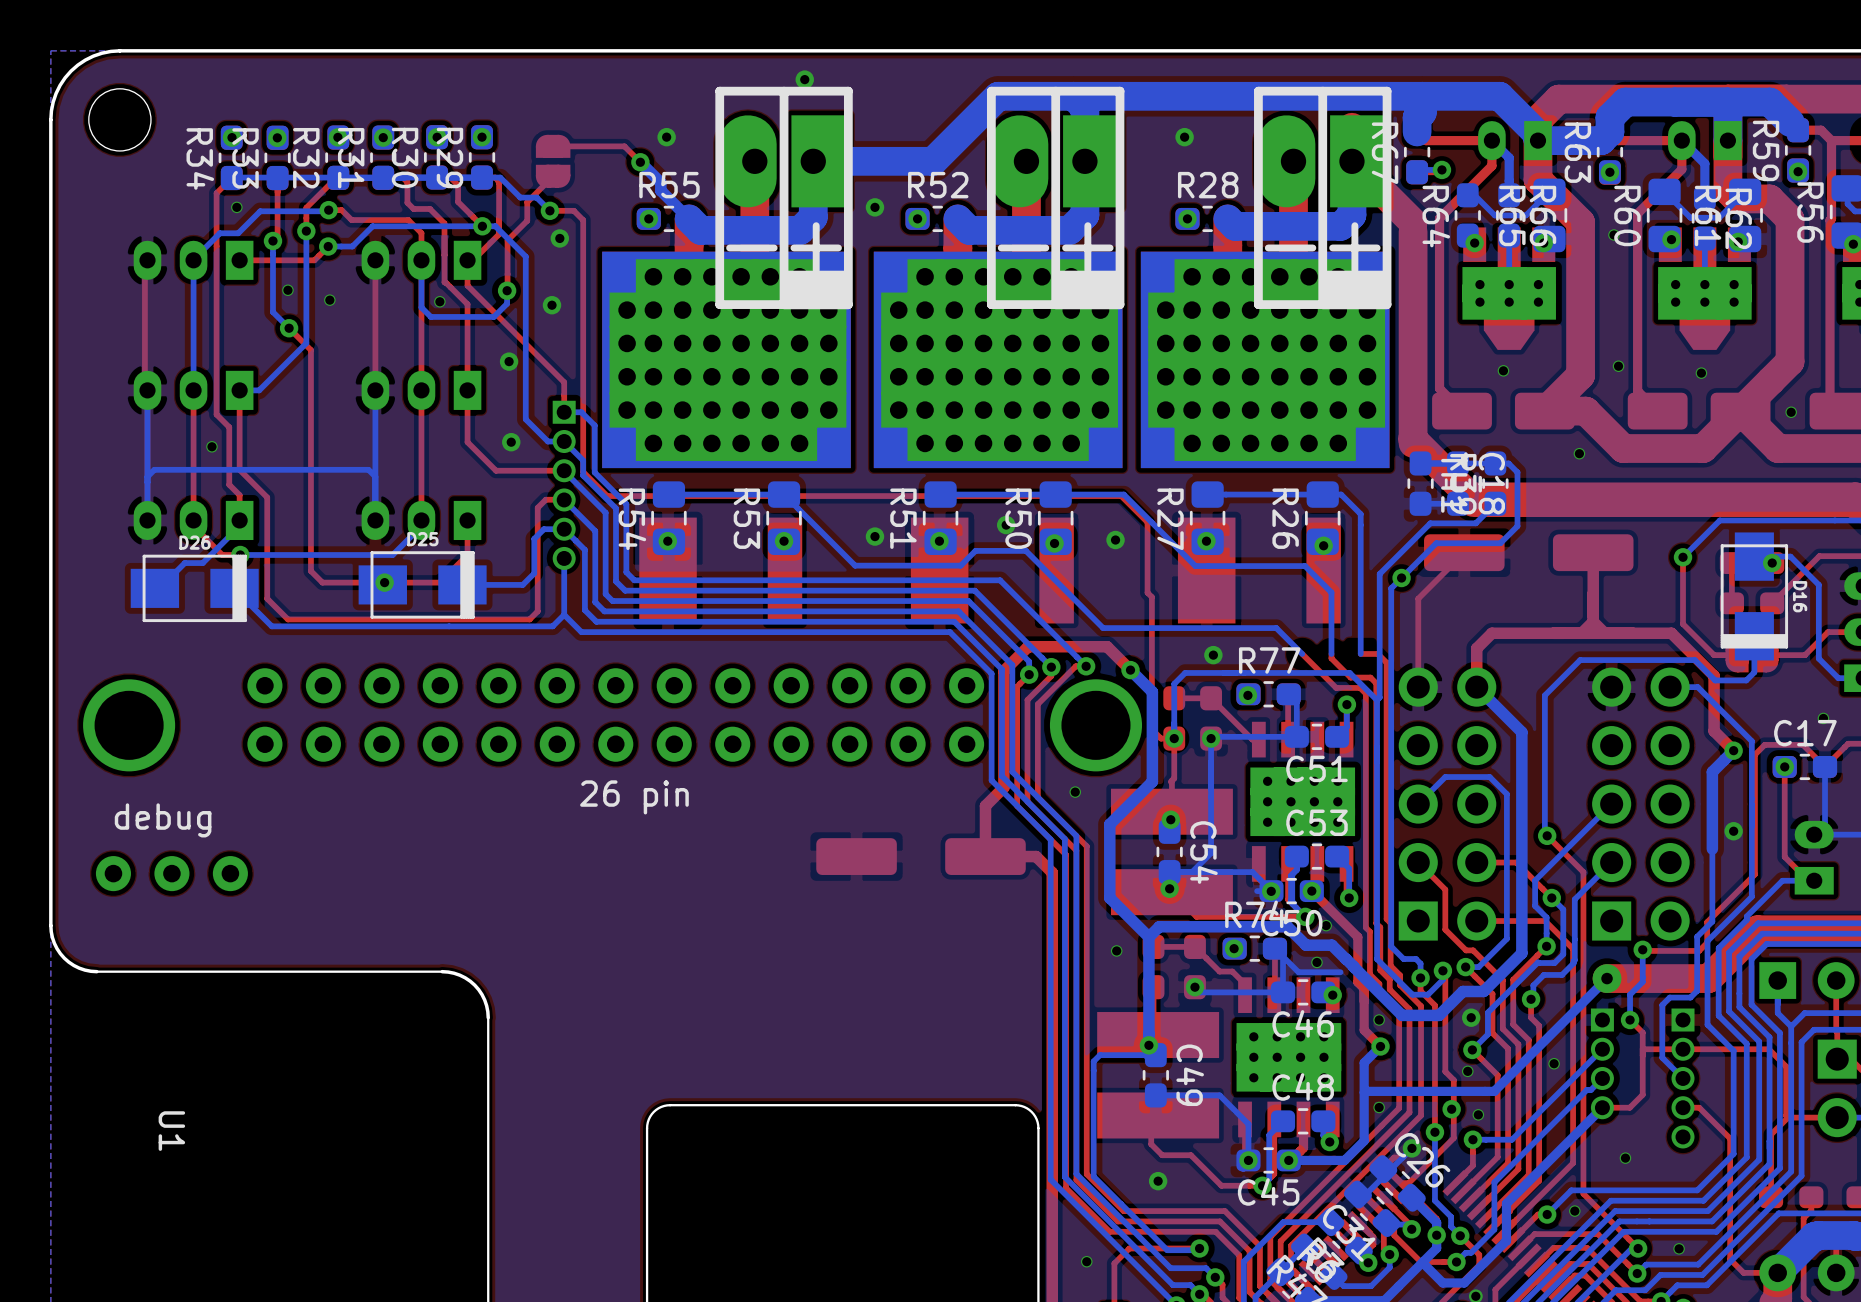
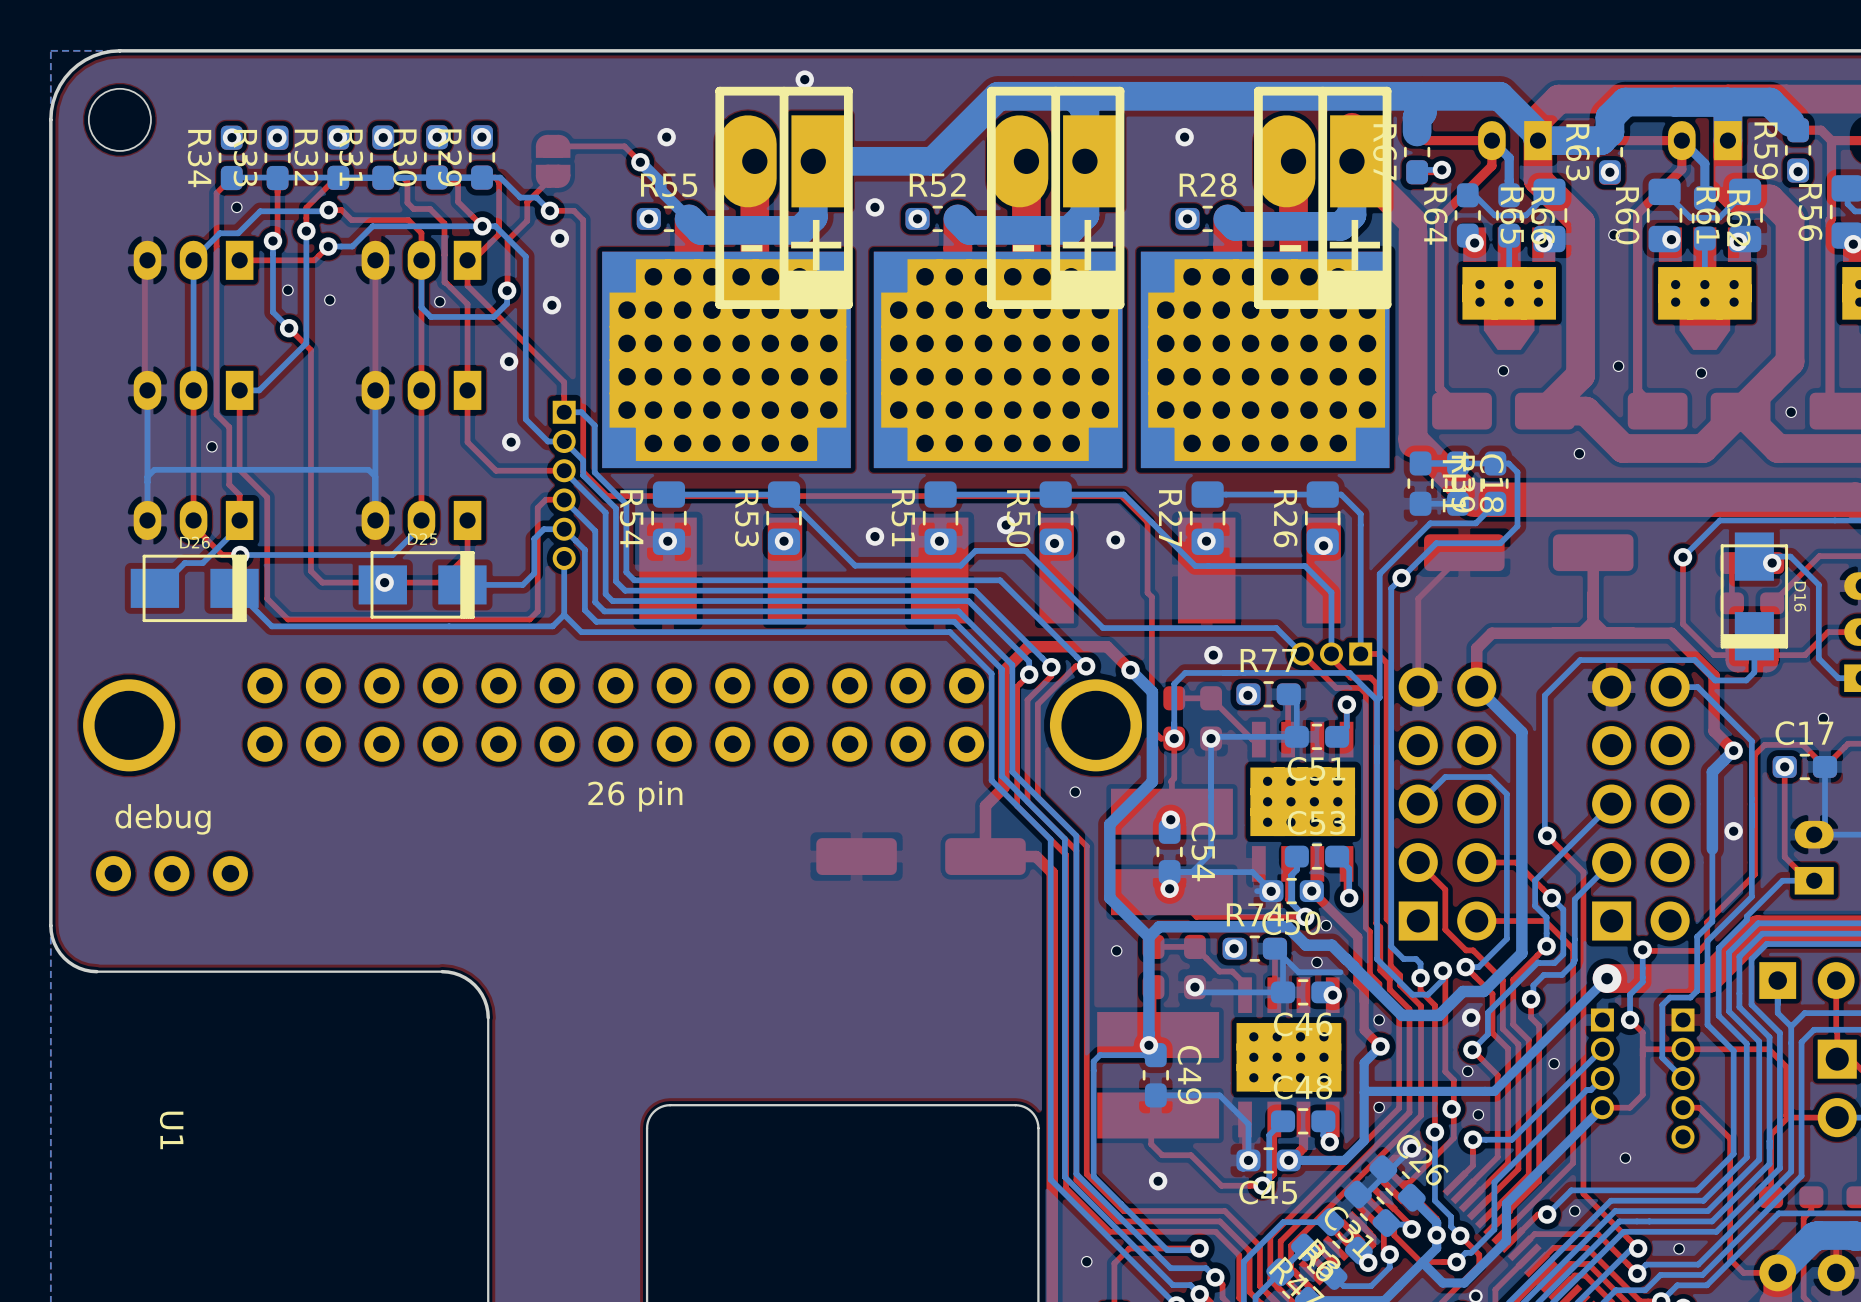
part: none -> (1331, 653)

